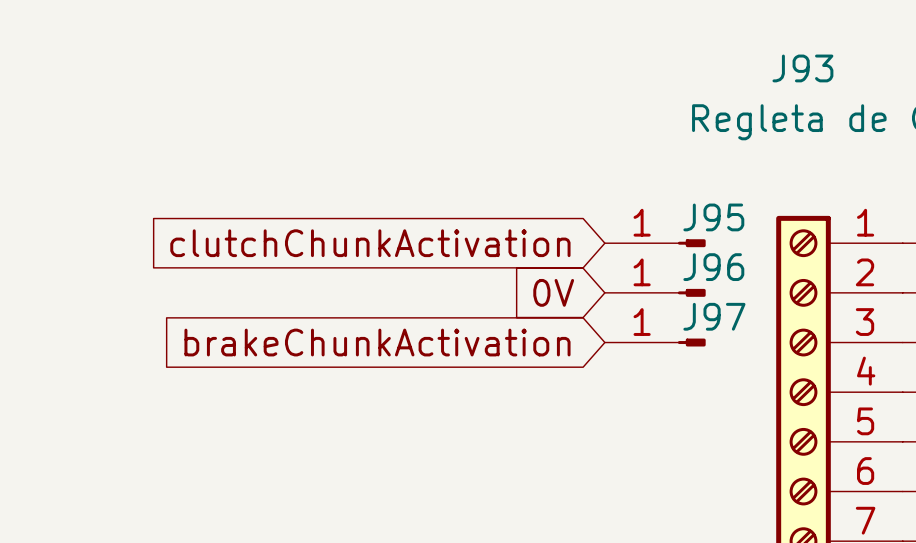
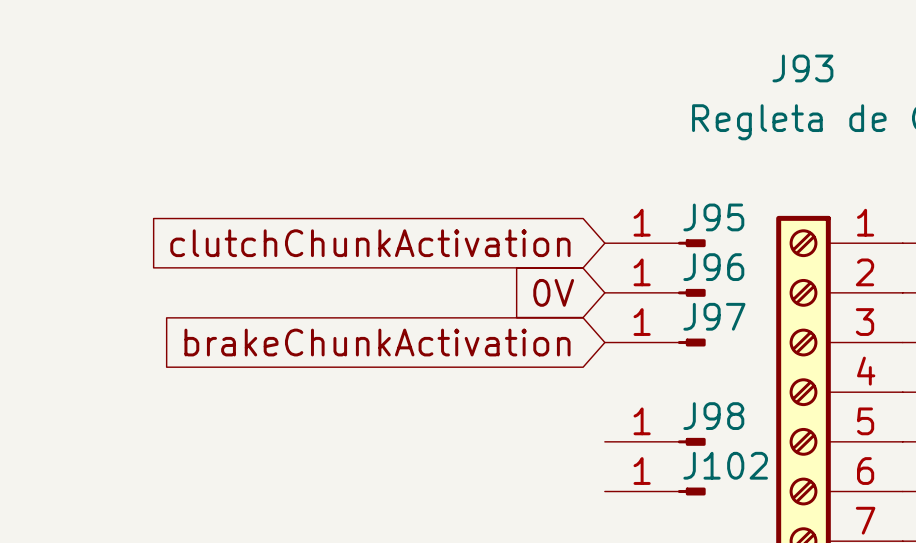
J98: none -> (655, 441)
J102: none -> (655, 491)

